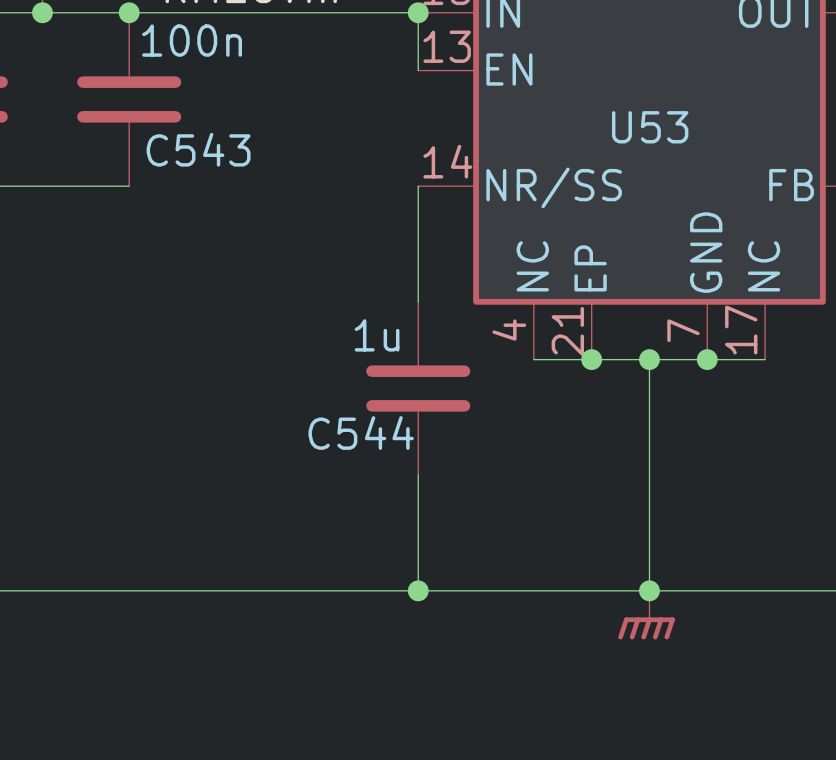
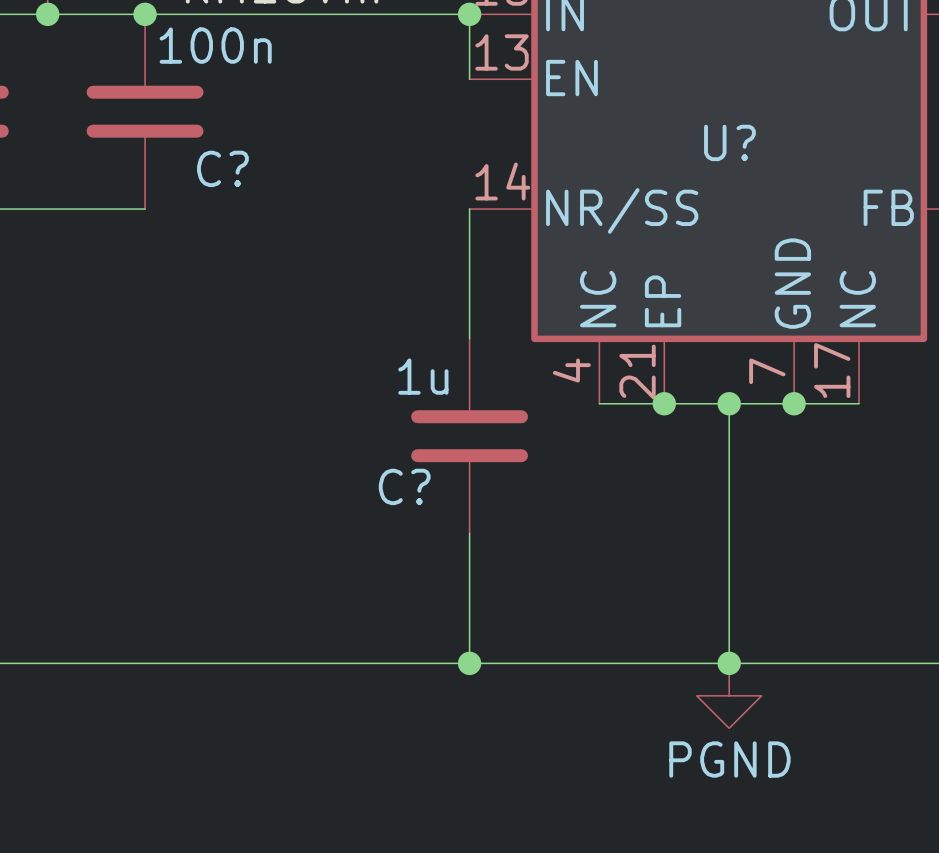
U53 name: U53 (650, 127) -> U? (729, 142)
C543 name: C543 (198, 149) -> C? (222, 168)
C544 name: C544 (361, 433) -> C? (404, 486)
power symbol shape: [618, 590, 675, 640] -> [696, 663, 762, 729]
power symbol text: none -> PGND (729, 759)

